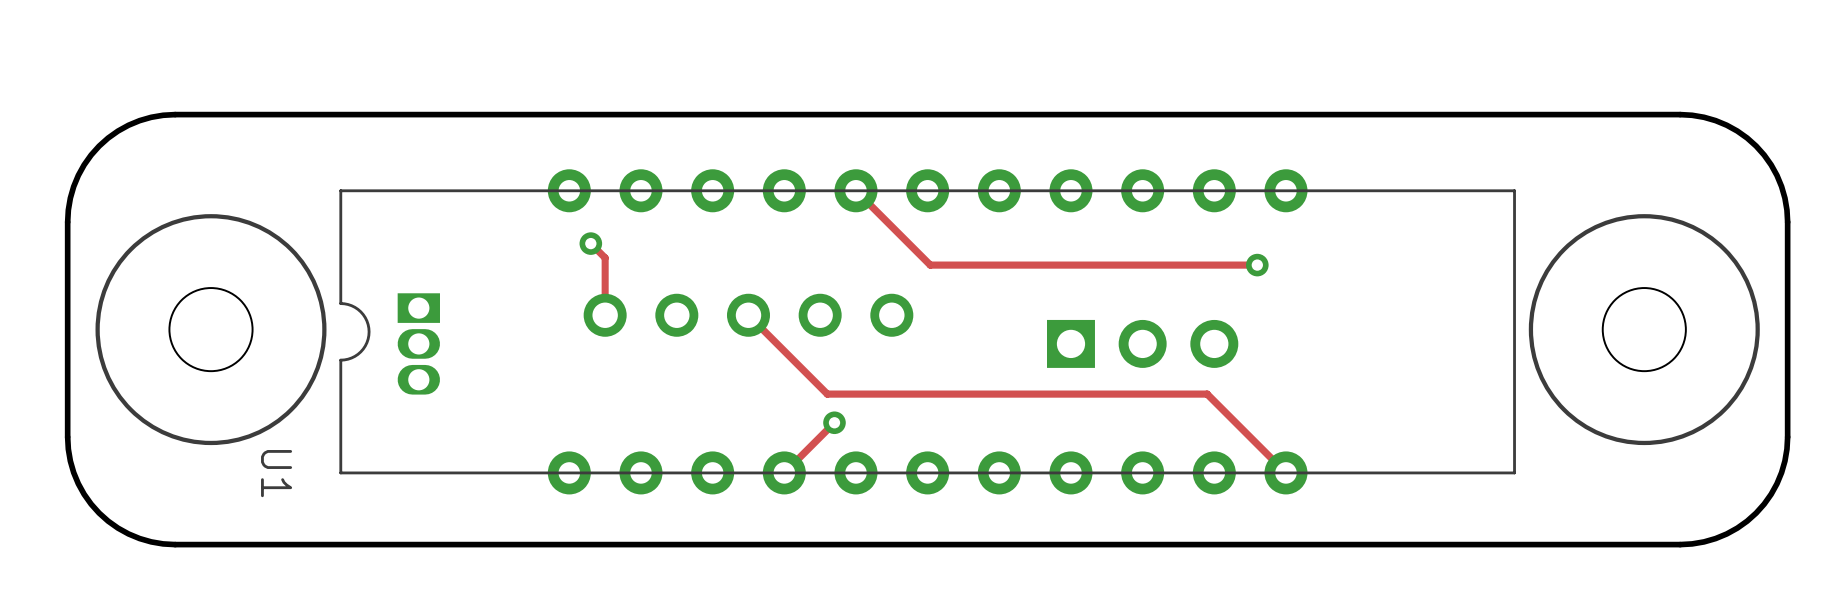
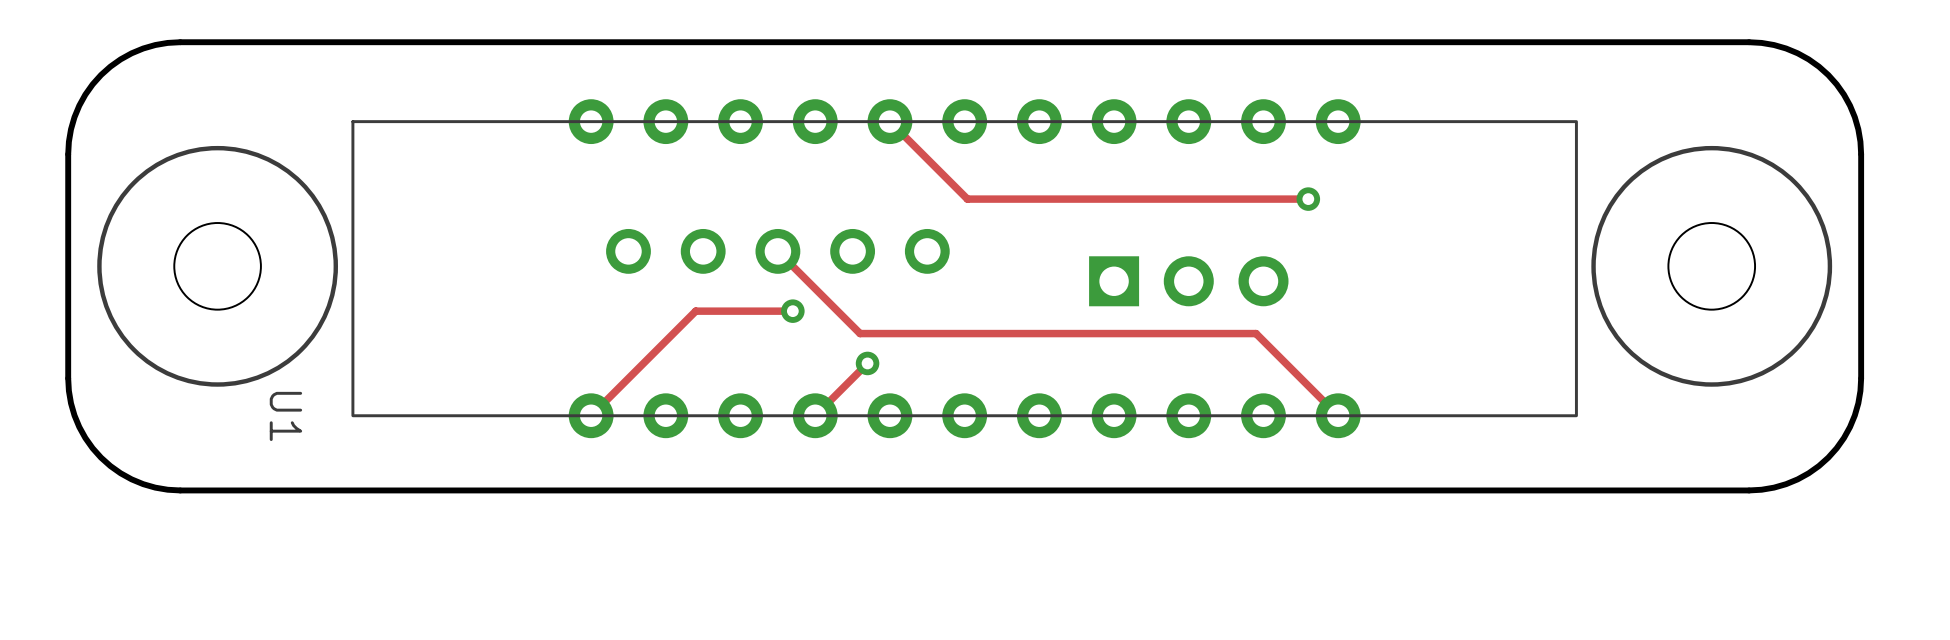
U1 footprint: [339, 169, 1516, 495] -> [351, 99, 1578, 439]
track: (590, 243) (605, 257) (605, 315) -> none
via: (590, 243) -> none
part: (418, 343) -> none
track: none -> (792, 311) (695, 311) (591, 415)
via: none -> (792, 311)

